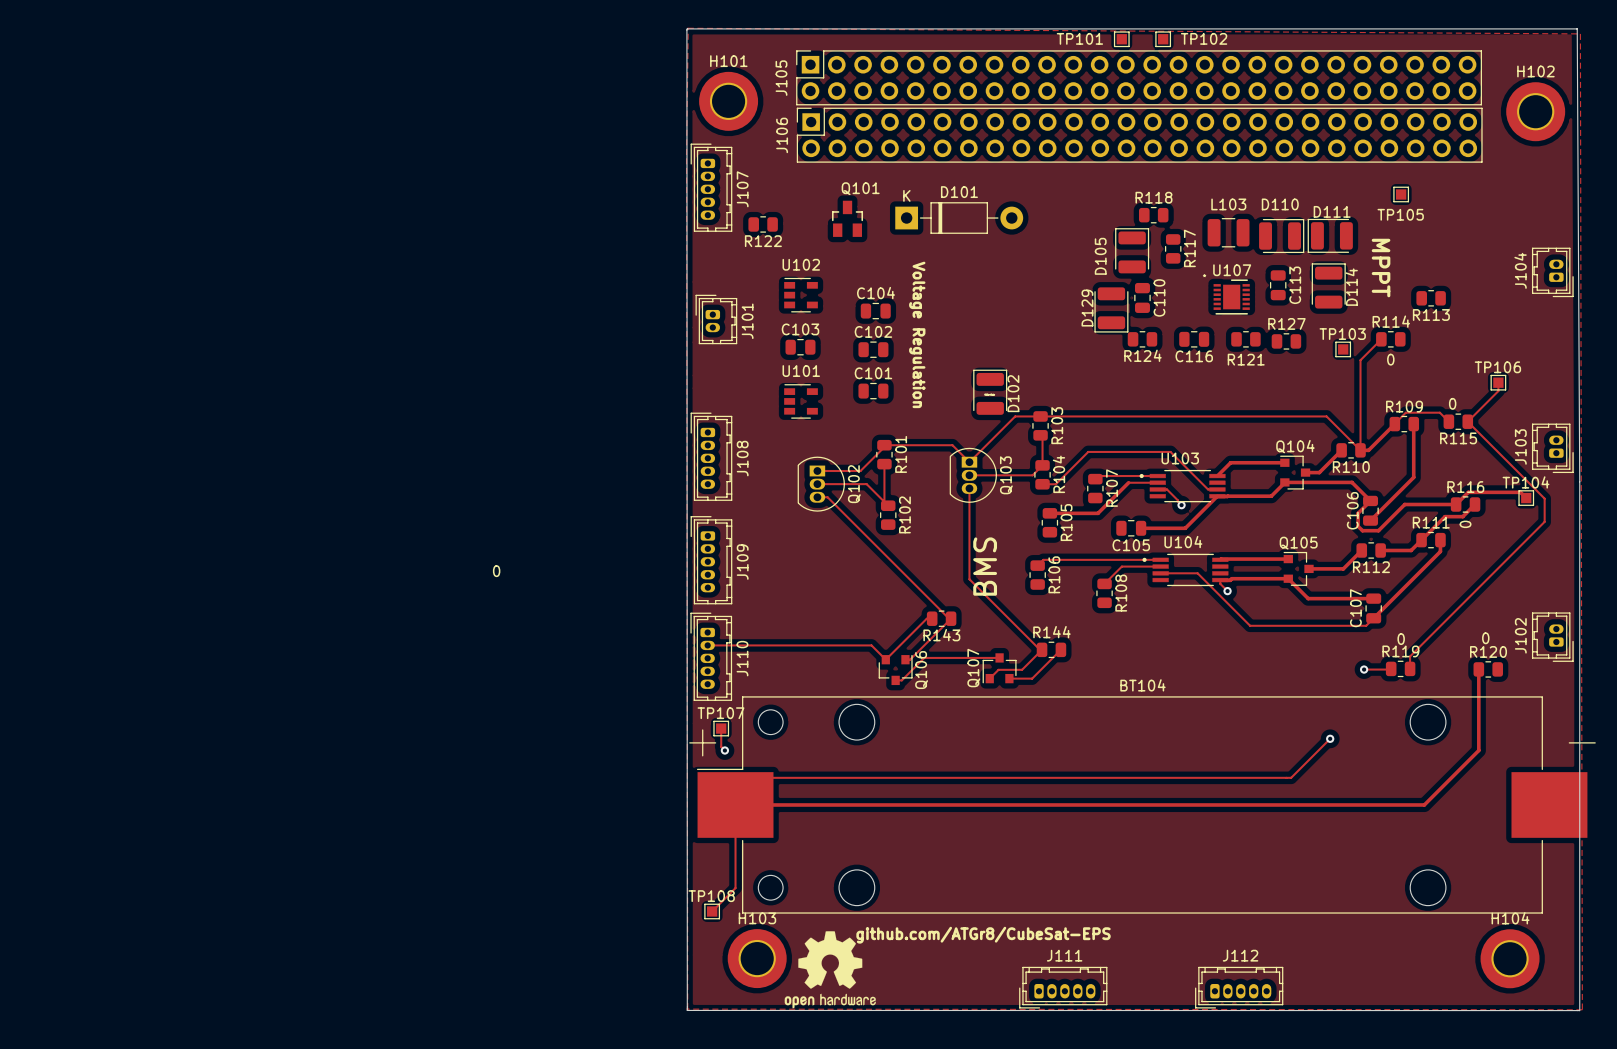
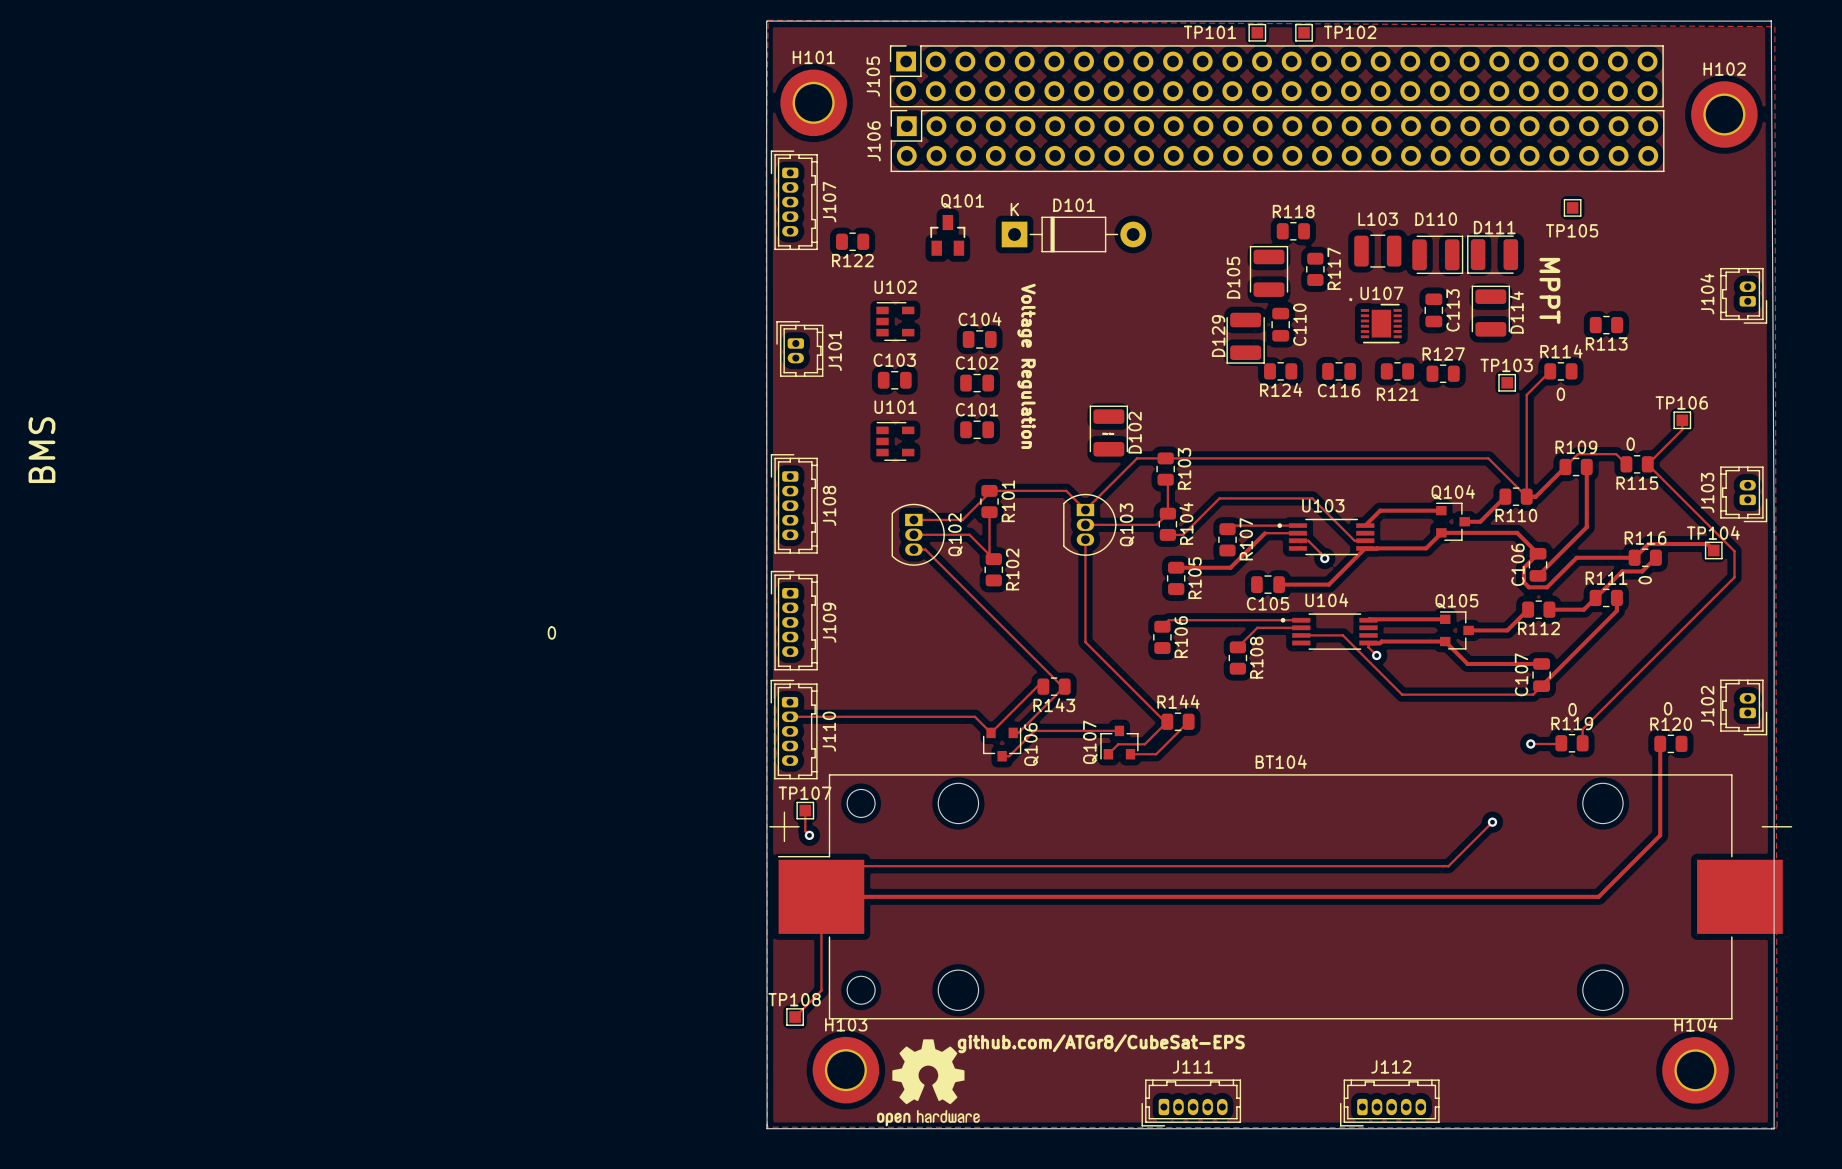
text: none -> BMS (41, 450)
text: BMS (985, 566) -> none

